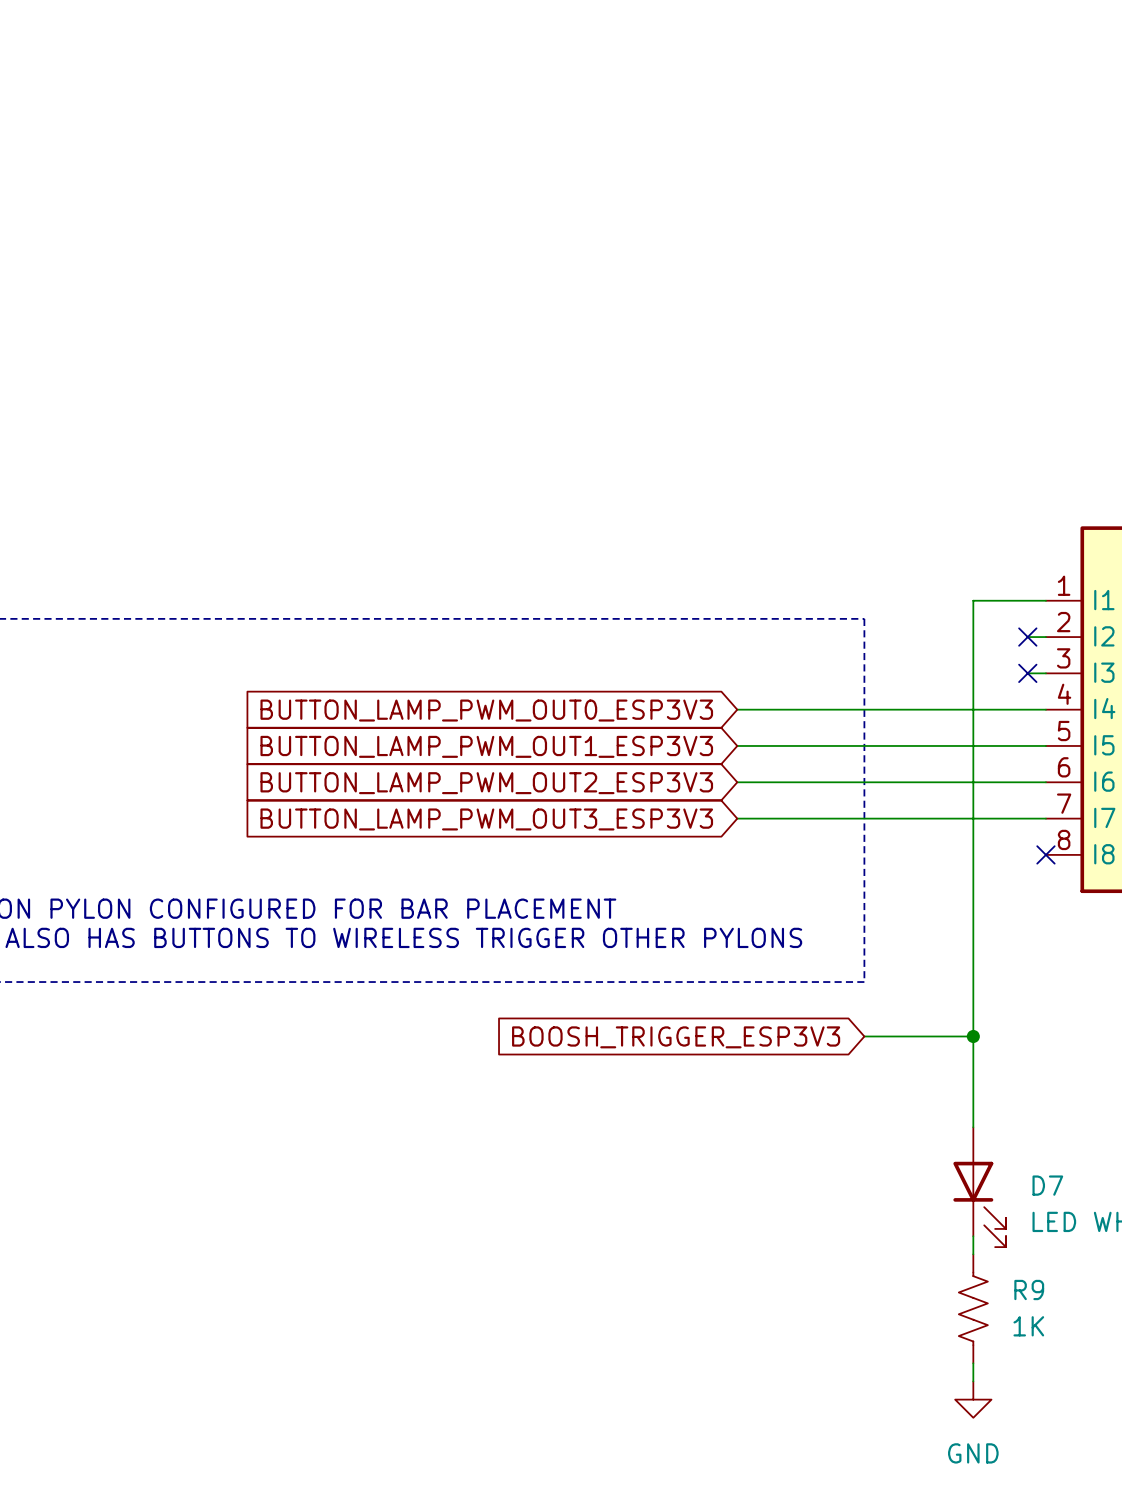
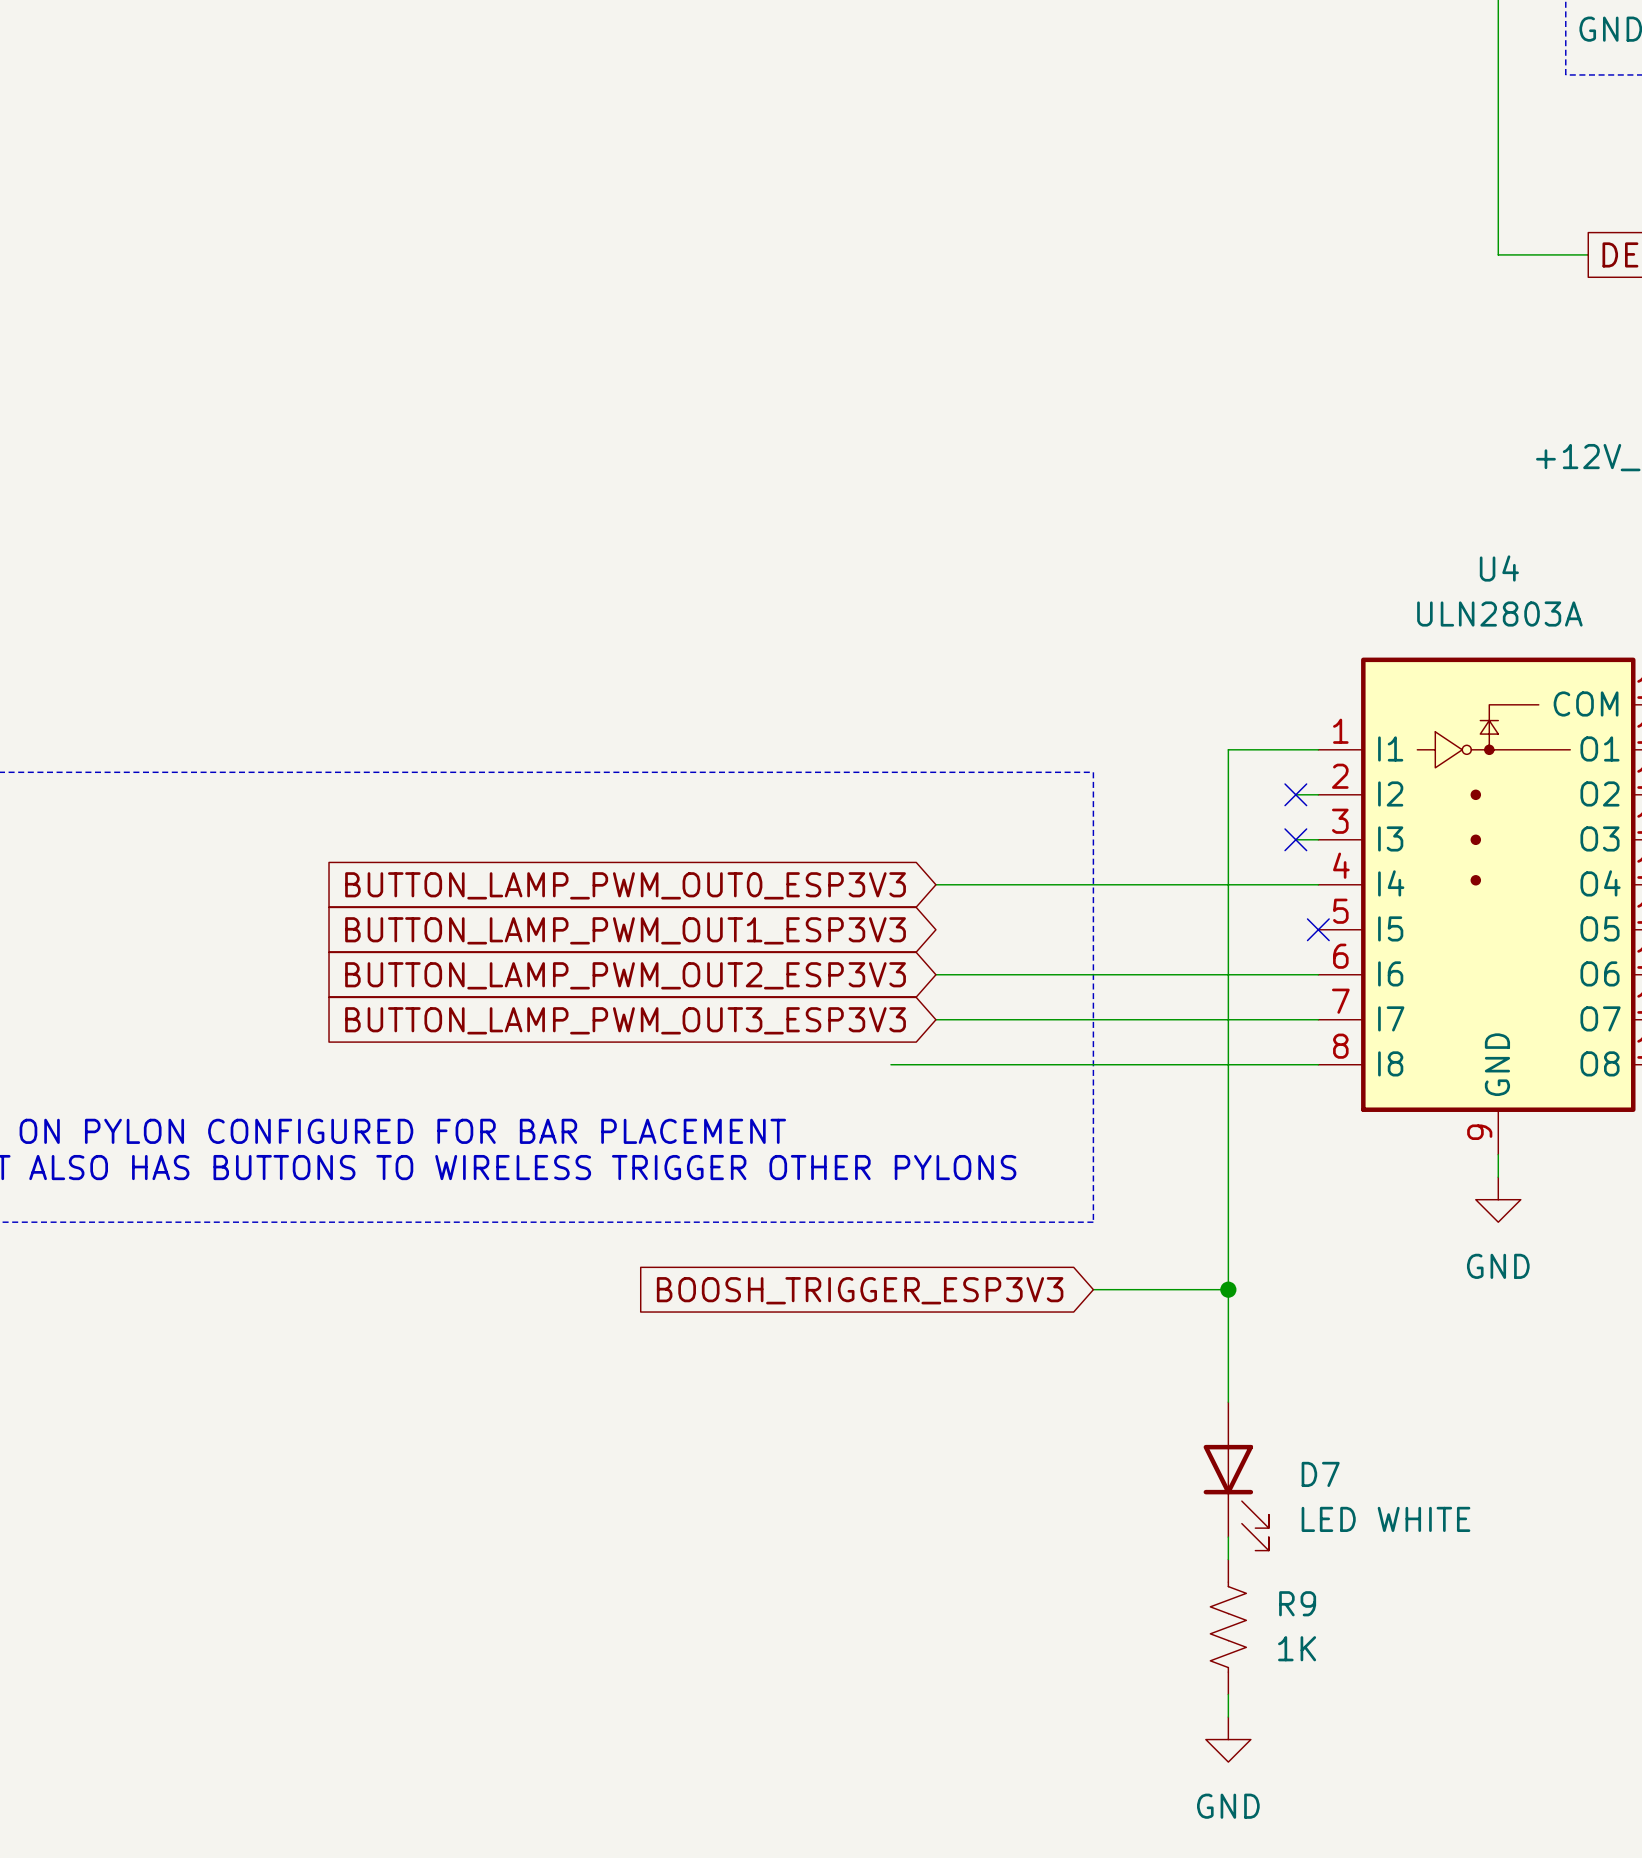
wire: (737, 745) (1045, 745) -> none
no-connect mark: none -> (1318, 929)
wire: none -> (890, 1064) (1318, 1064)
no-connect mark: (1045, 854) -> none

